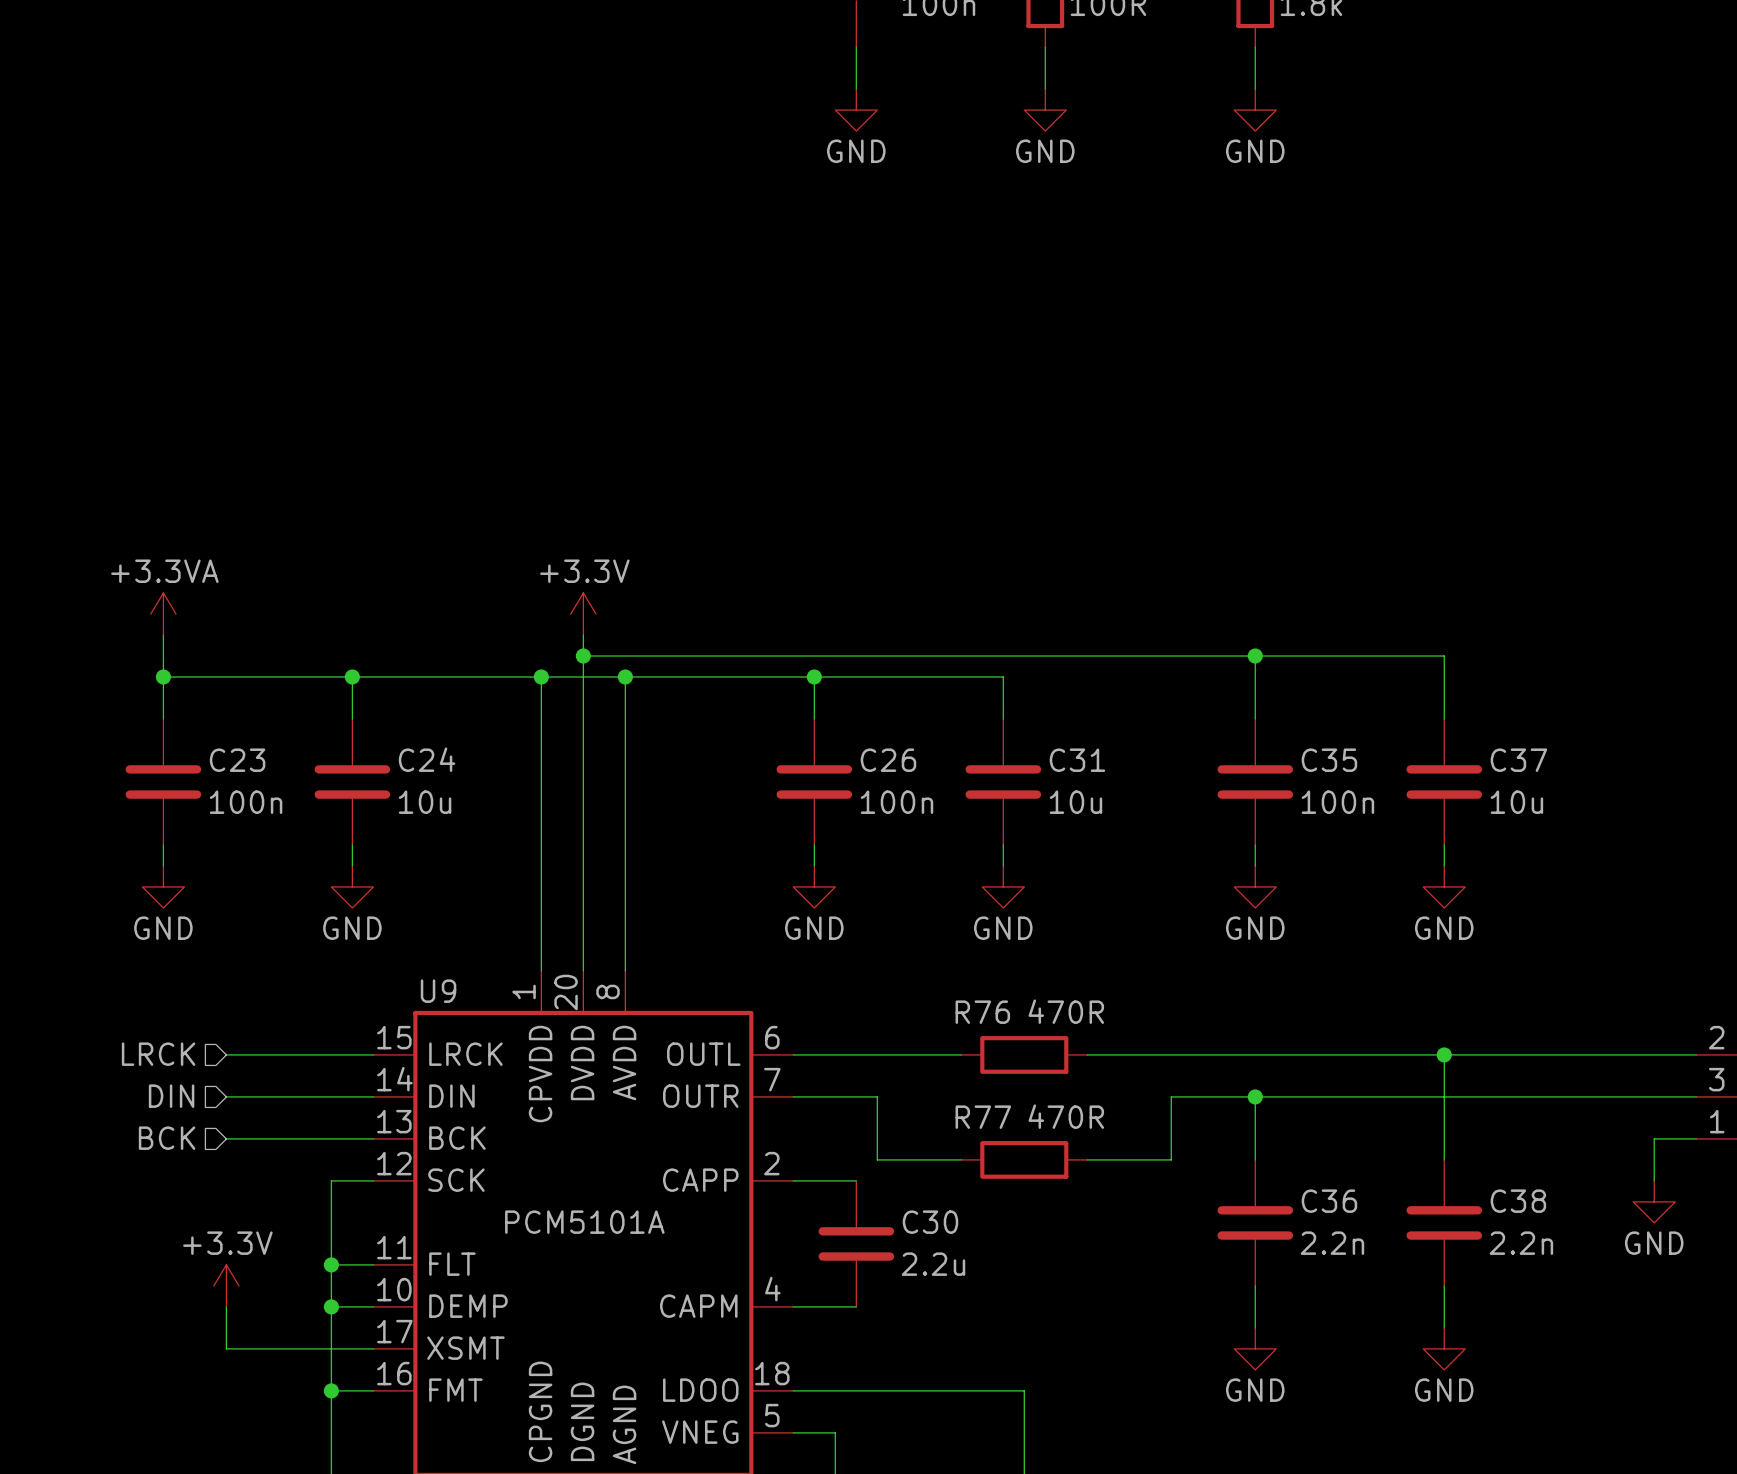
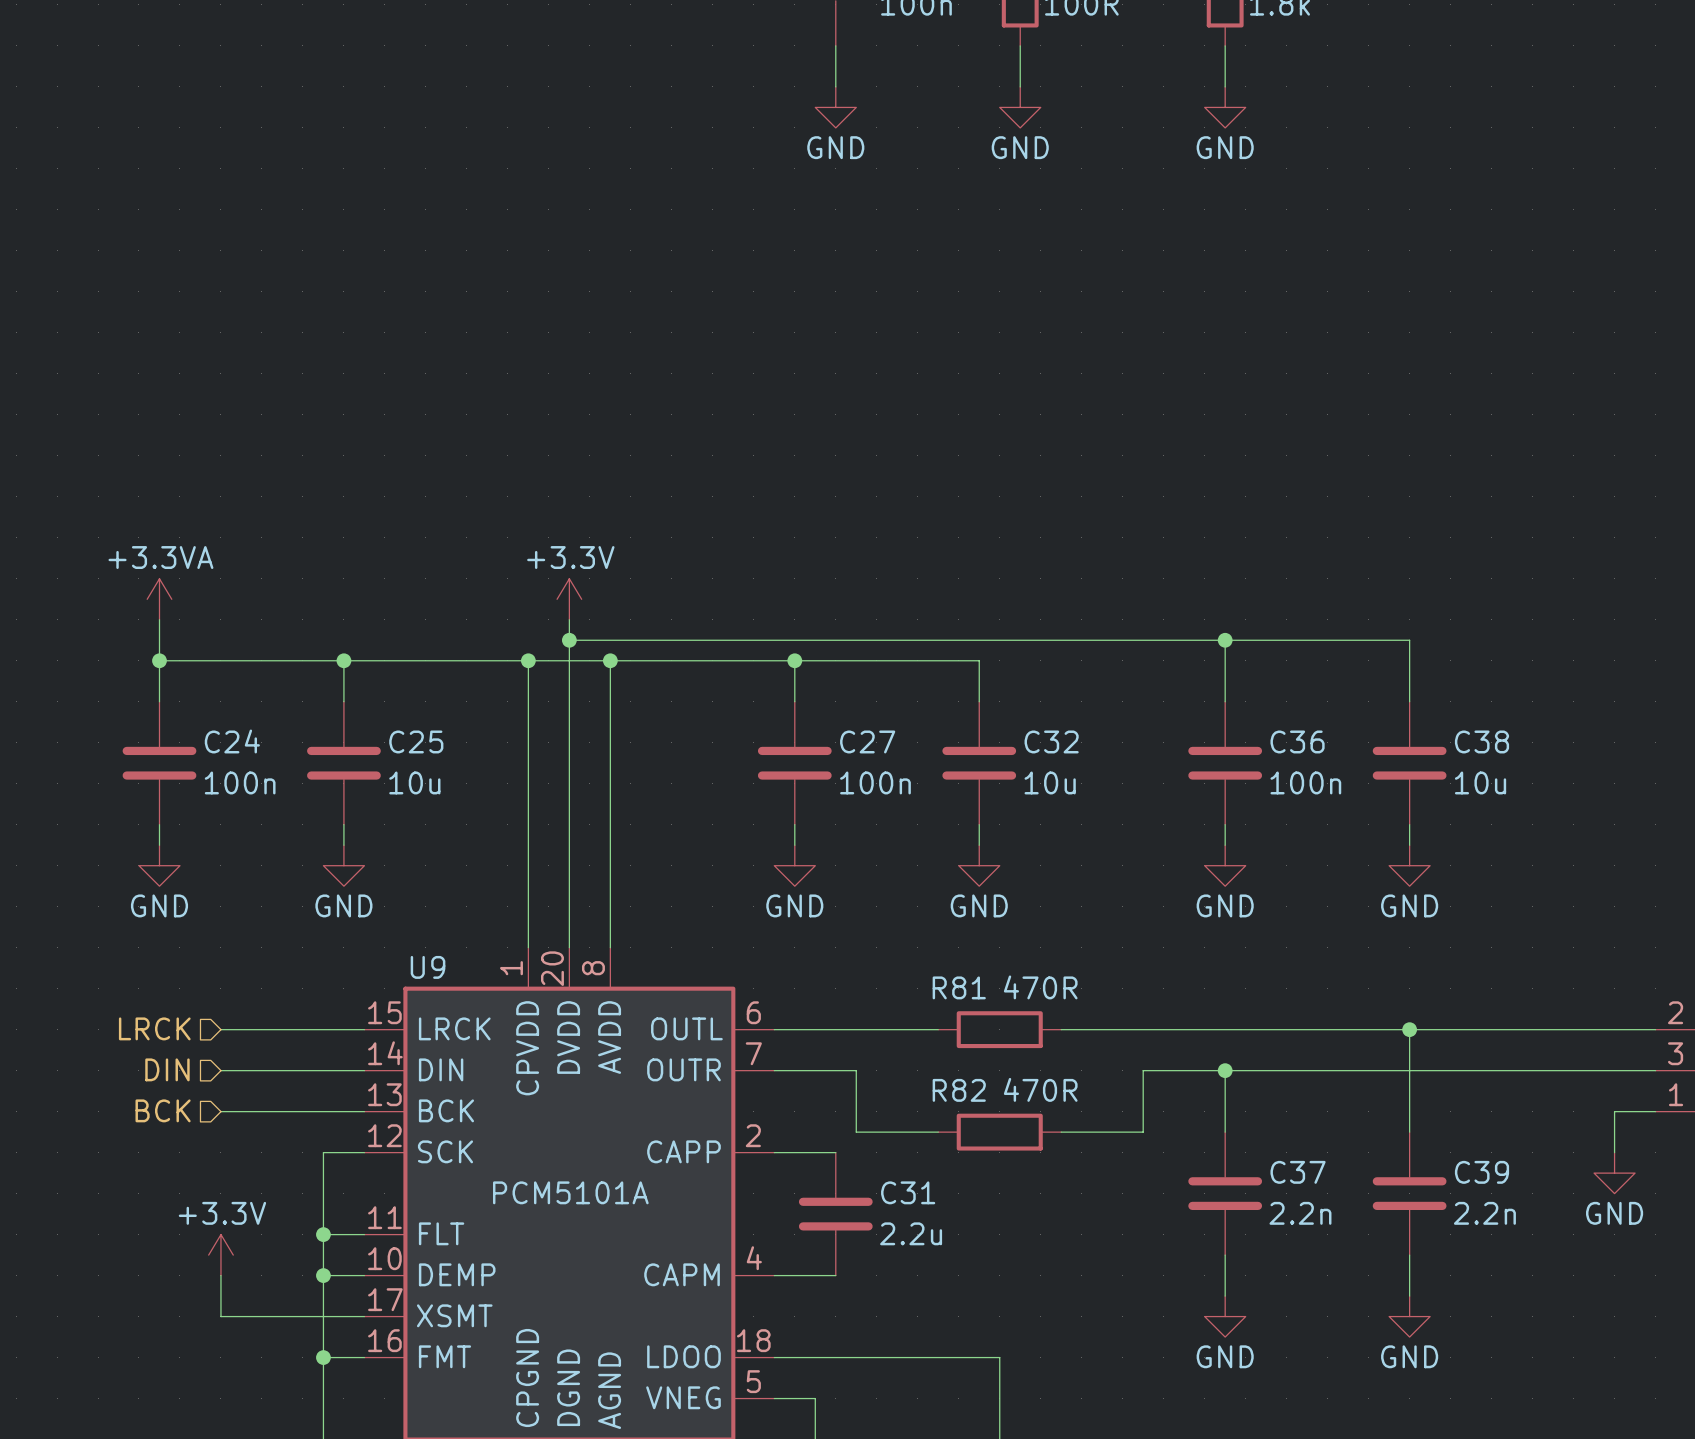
C24 name: C24 (427, 759) -> C25 (416, 741)
C23 name: C23 (237, 760) -> C24 (232, 741)
C26 name: C26 (888, 760) -> C27 (867, 741)
C31 name: C31 (1077, 760) -> C32 (1051, 741)
C35 name: C35 (1329, 760) -> C36 (1297, 741)
C37 name: C37 (1518, 760) -> C38 (1481, 741)
R76 name: R76 (982, 1012) -> R81 (959, 987)
R77 name: R77 (983, 1117) -> R82 (959, 1090)
C36 name: C36 (1329, 1201) -> C37 (1298, 1172)
C38 name: C38 (1518, 1201) -> C39 (1481, 1172)
C30 name: C30 (930, 1222) -> C31 (908, 1192)

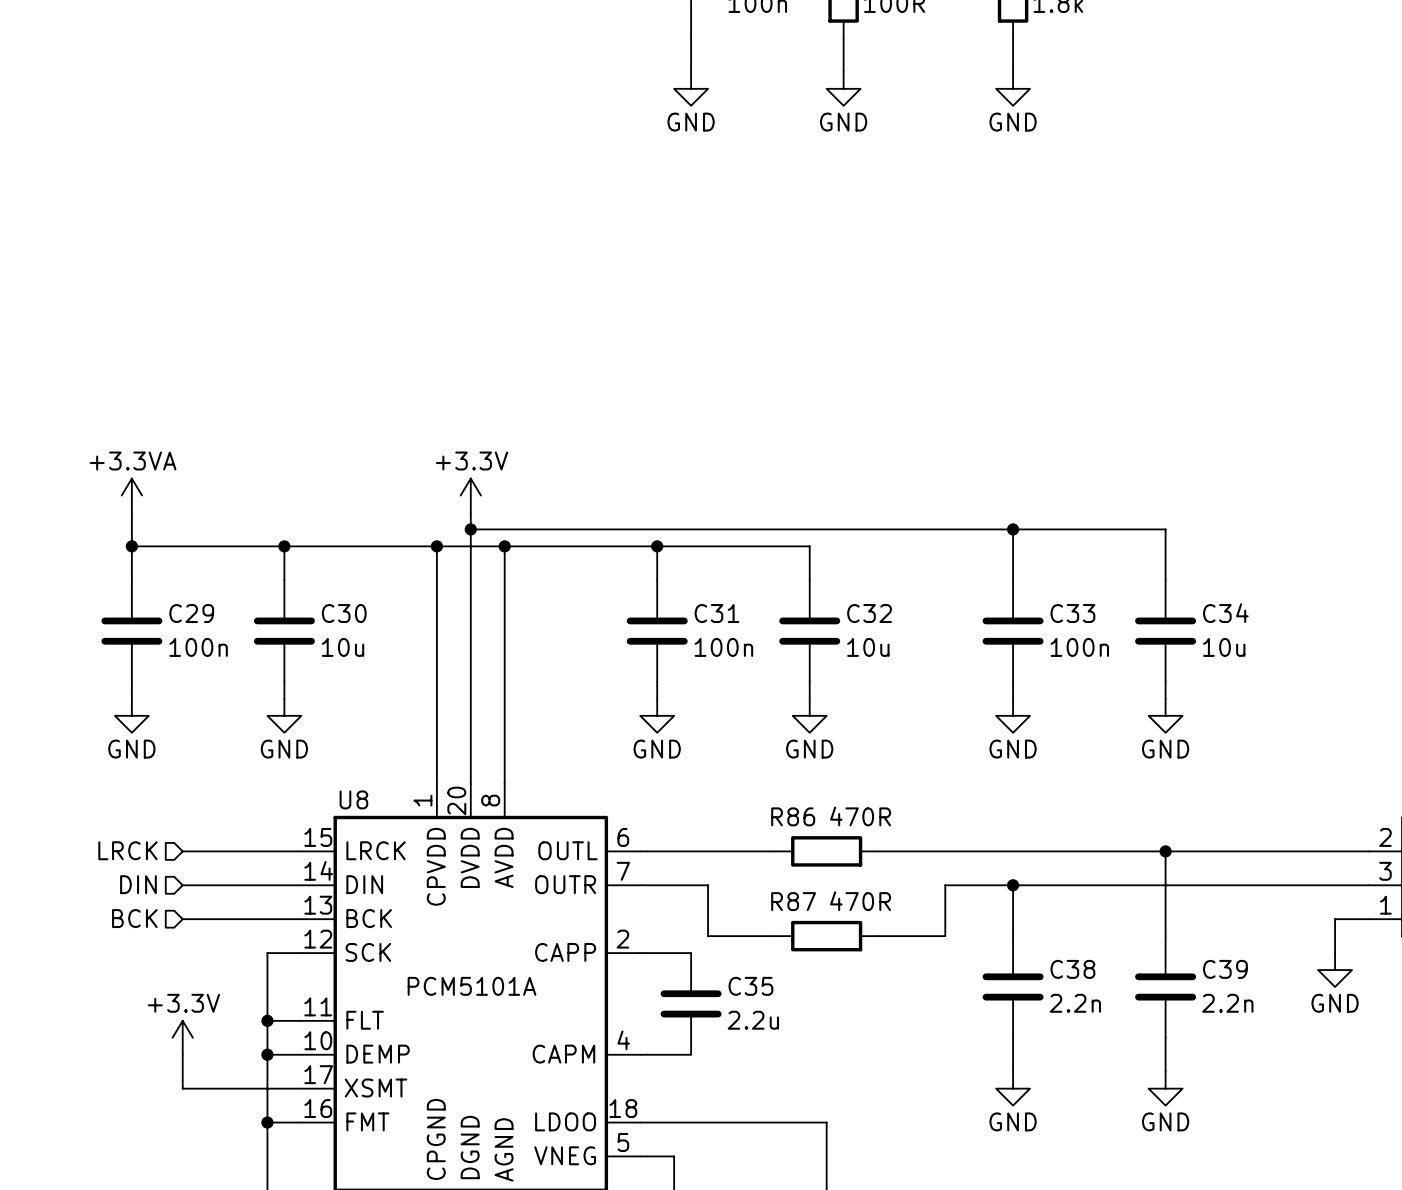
C24 name: C24 (232, 741) -> C29 (191, 613)
C25 name: C25 (416, 741) -> C30 (344, 613)
C27 name: C27 (867, 741) -> C31 (717, 613)
C36 name: C36 (1297, 741) -> C33 (1072, 613)
C38 name: C38 (1481, 741) -> C34 (1225, 613)
U9 name: U9 (428, 967) -> U8 (353, 799)
R81 name: R81 (959, 987) -> R86 (793, 816)
R82 name: R82 (959, 1090) -> R87 (793, 901)
C37 name: C37 (1298, 1172) -> C38 (1072, 969)
C31 name: C31 (908, 1192) -> C35 (750, 986)

